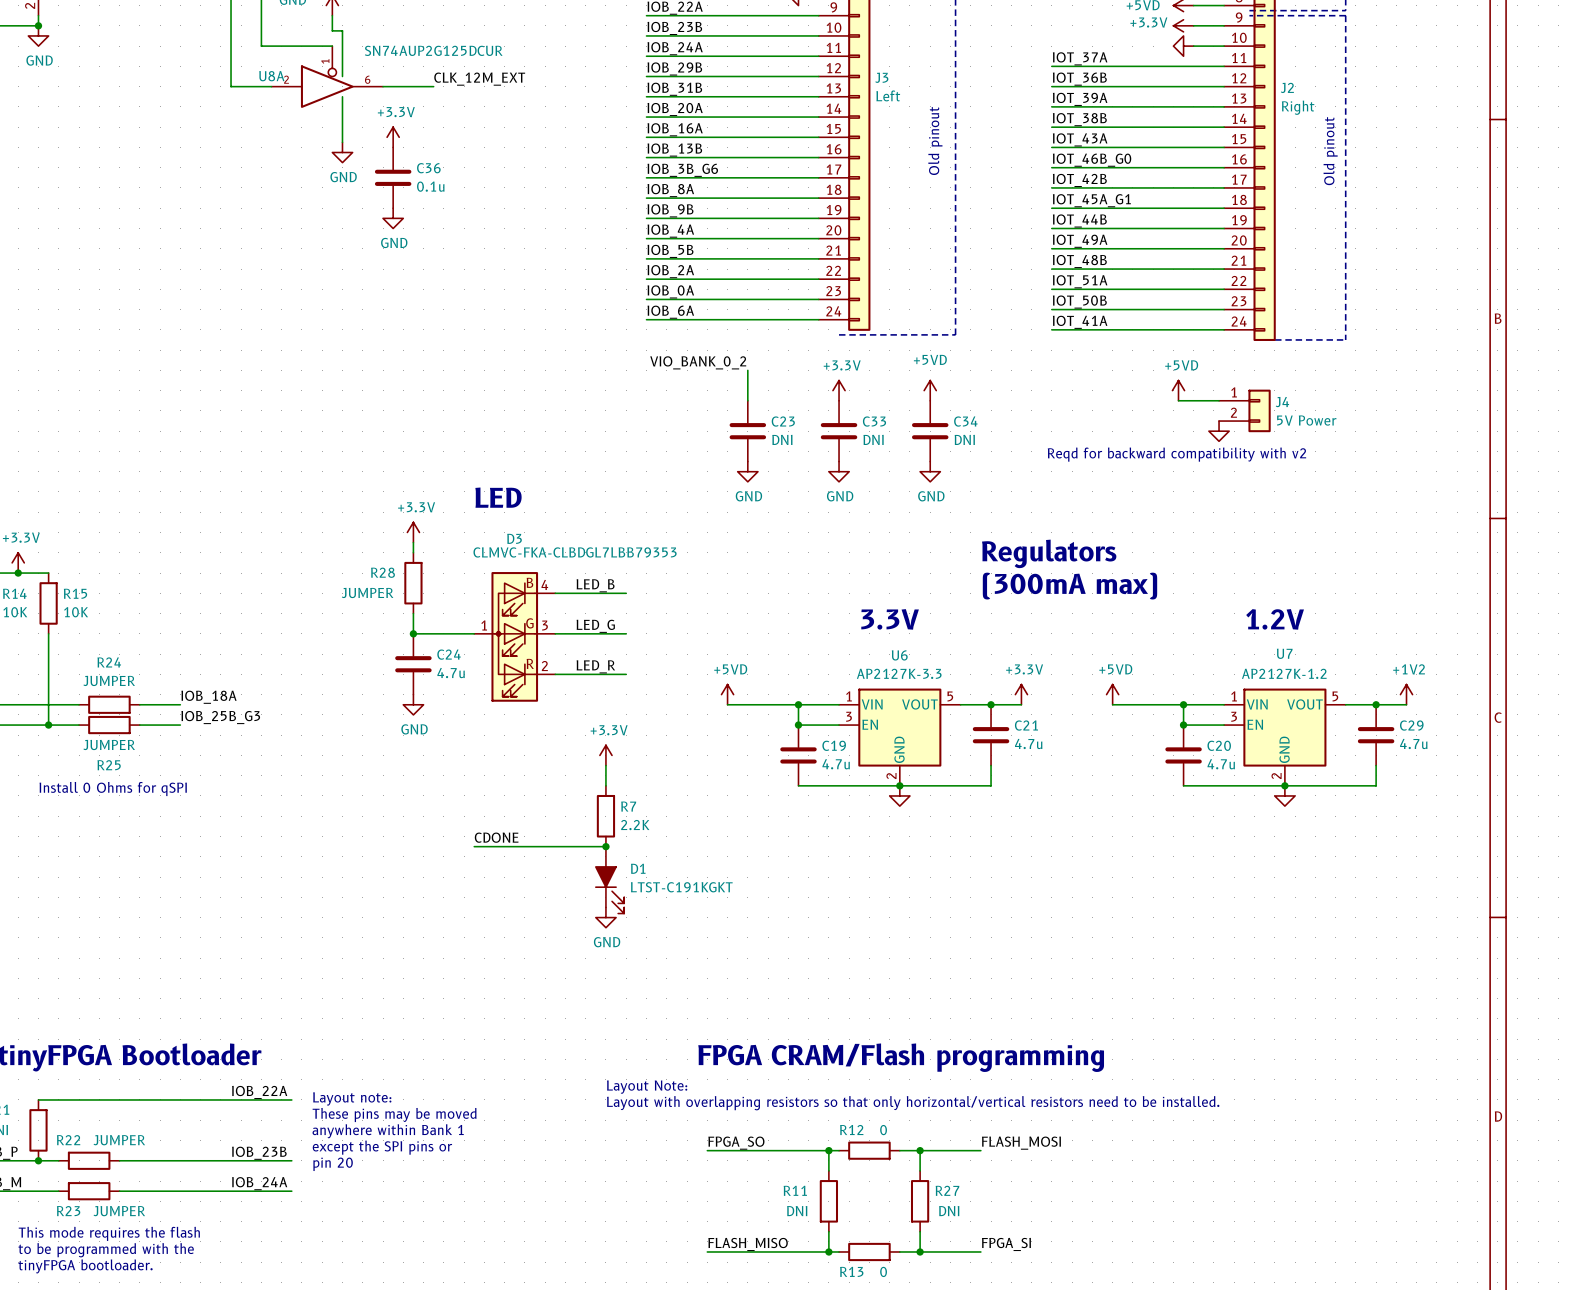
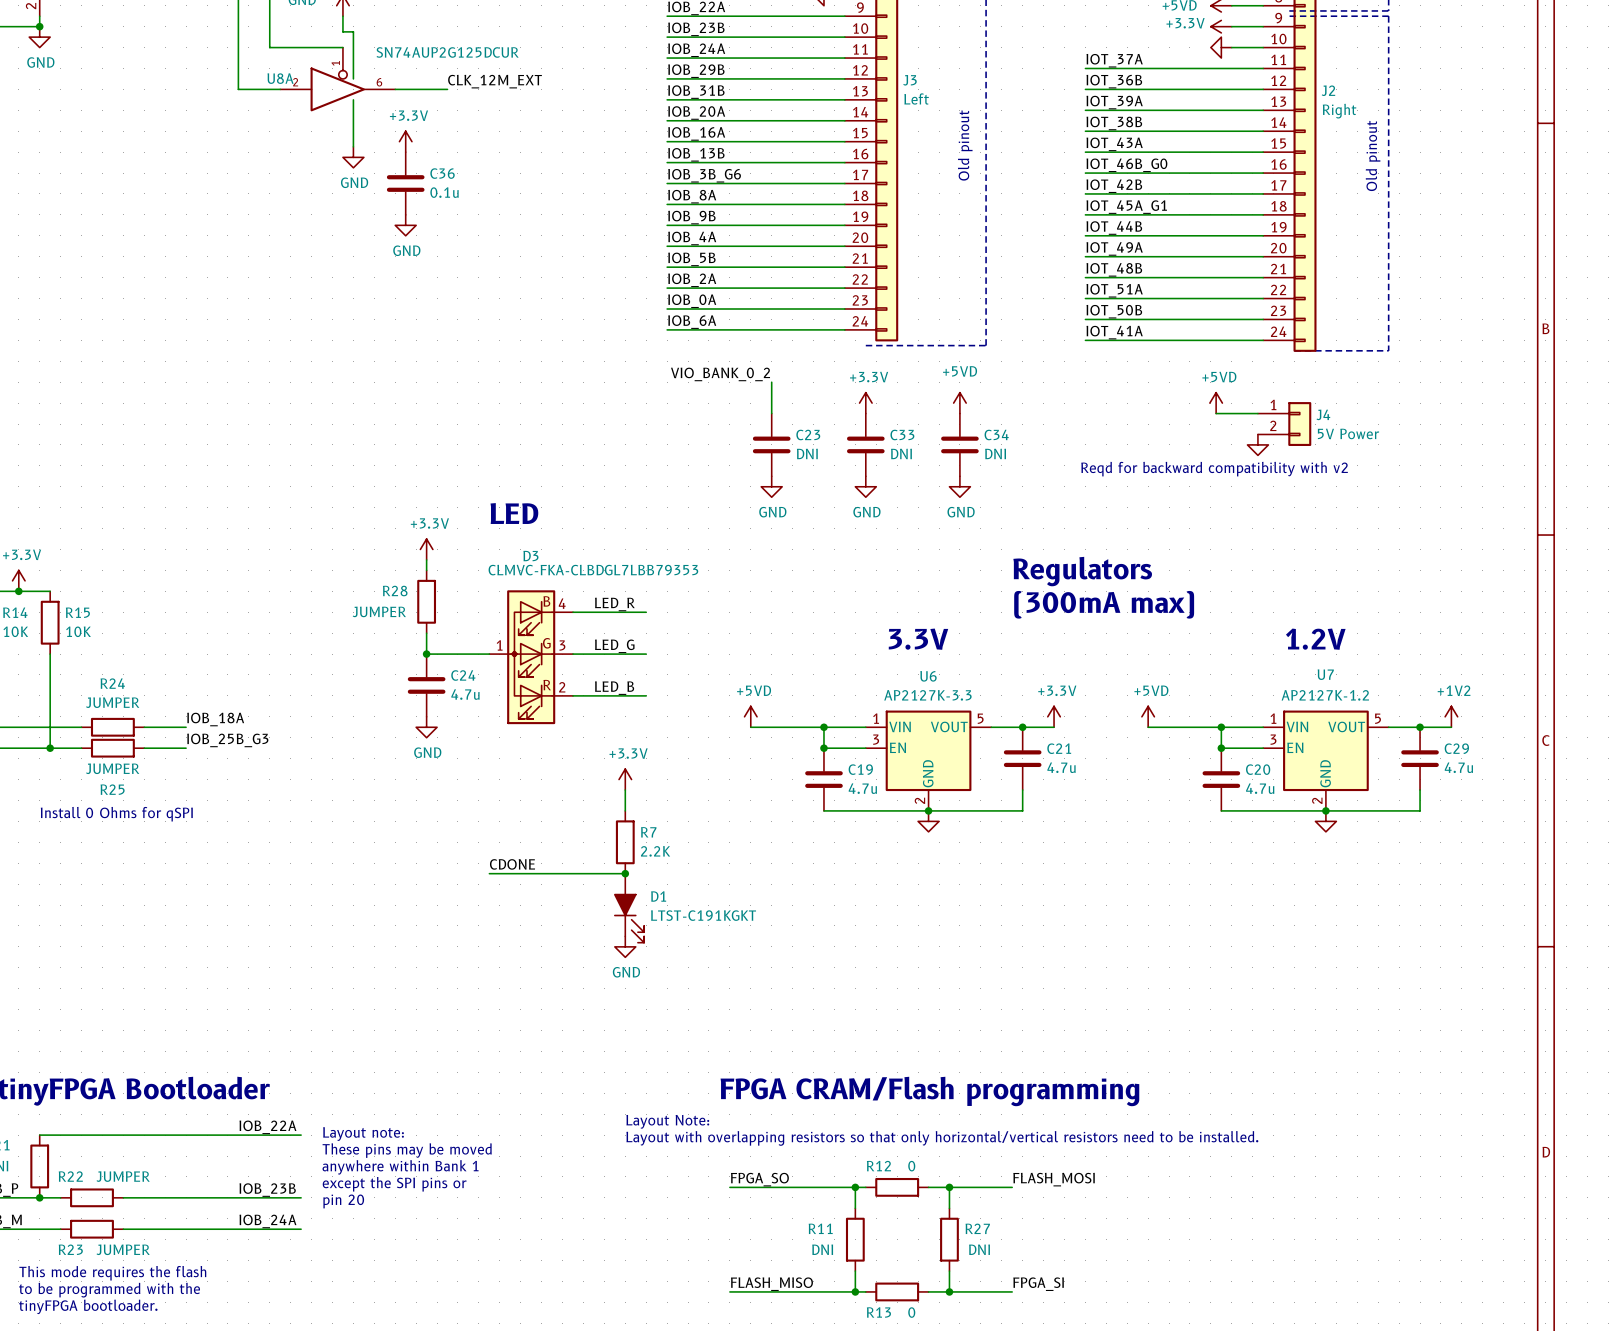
label: LED_B (595, 585) -> LED_R (614, 604)
label: LED_R (595, 666) -> LED_B (614, 688)

